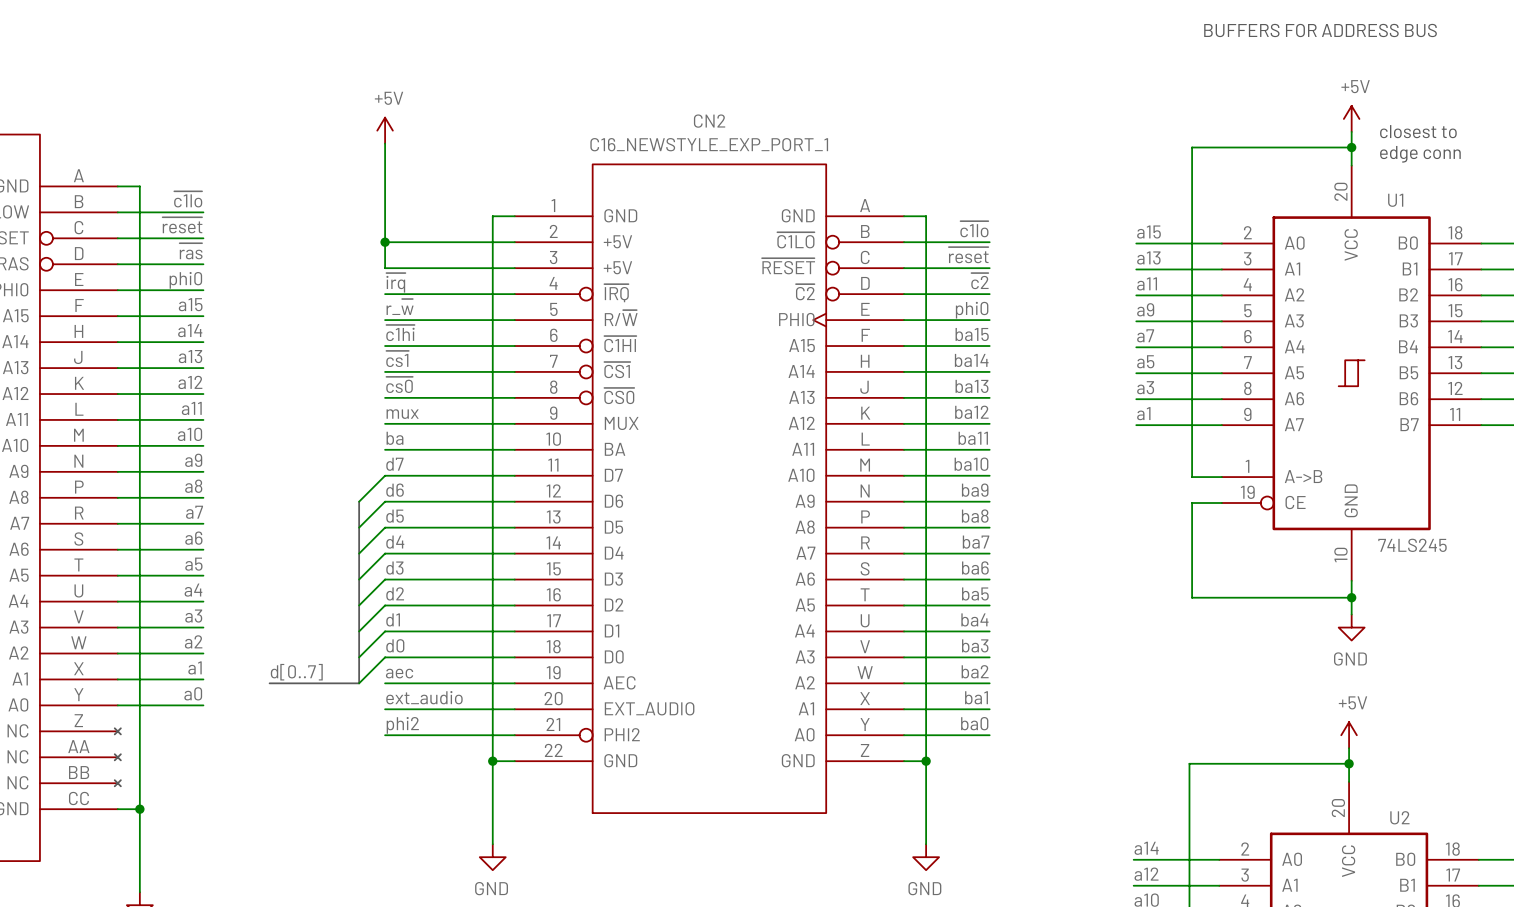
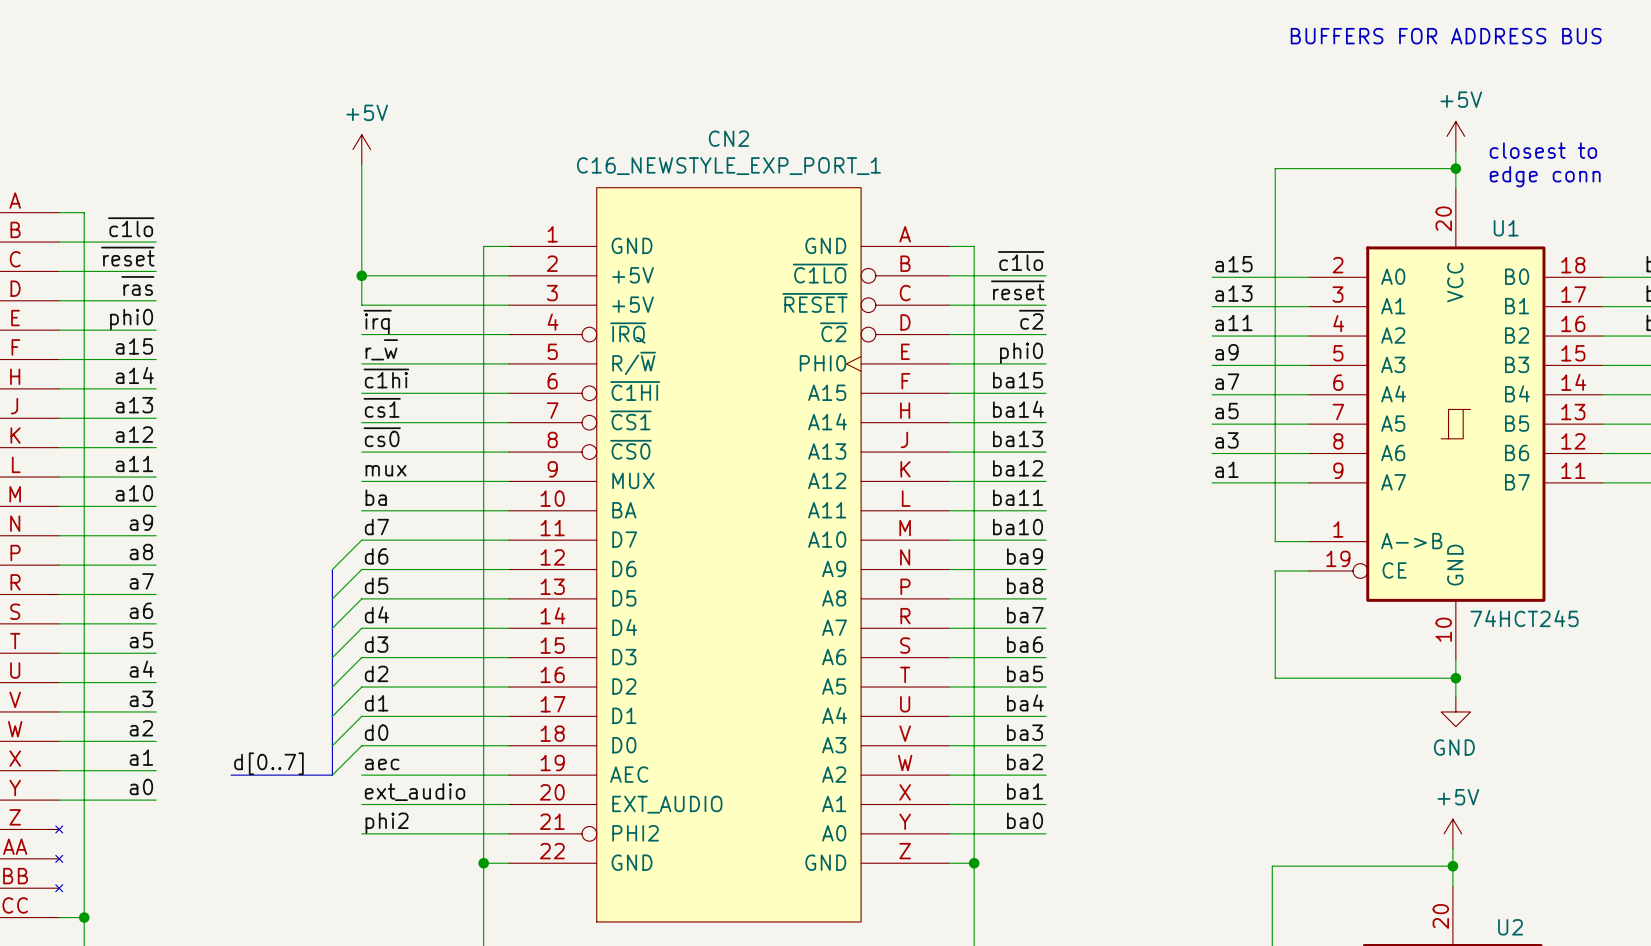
U1 value: 74LS245 (1412, 545) -> 74HCT245 (1524, 618)

